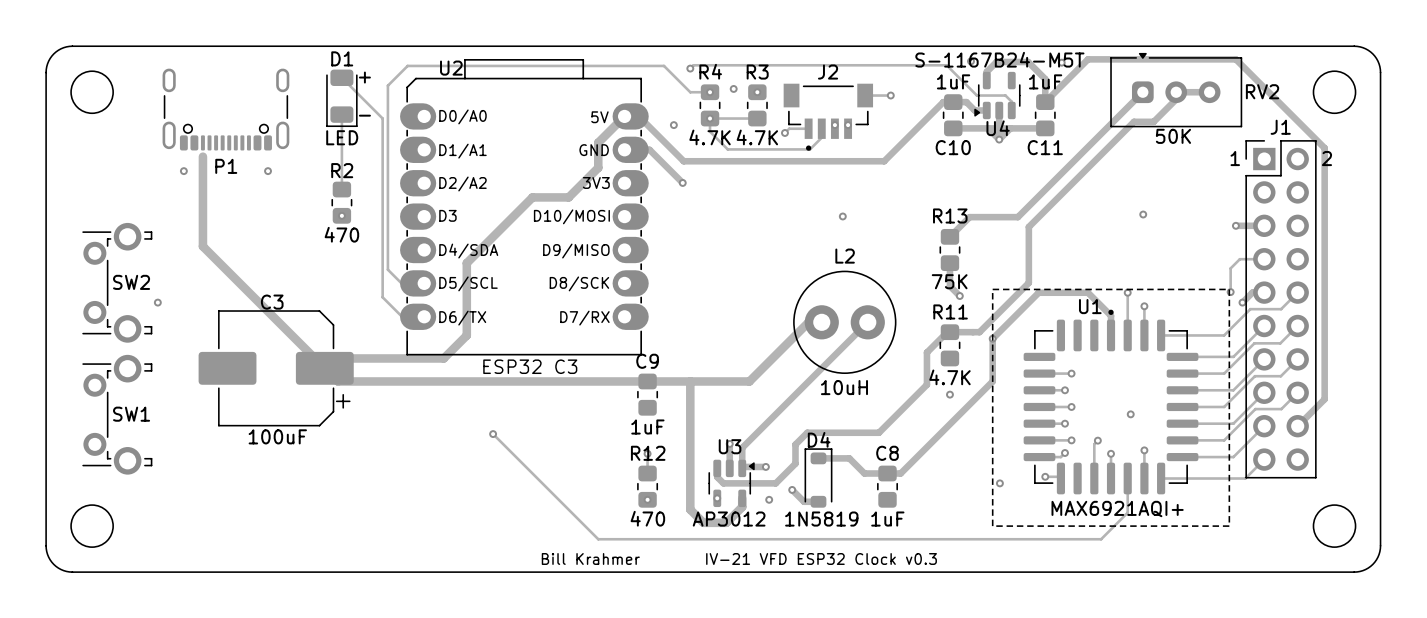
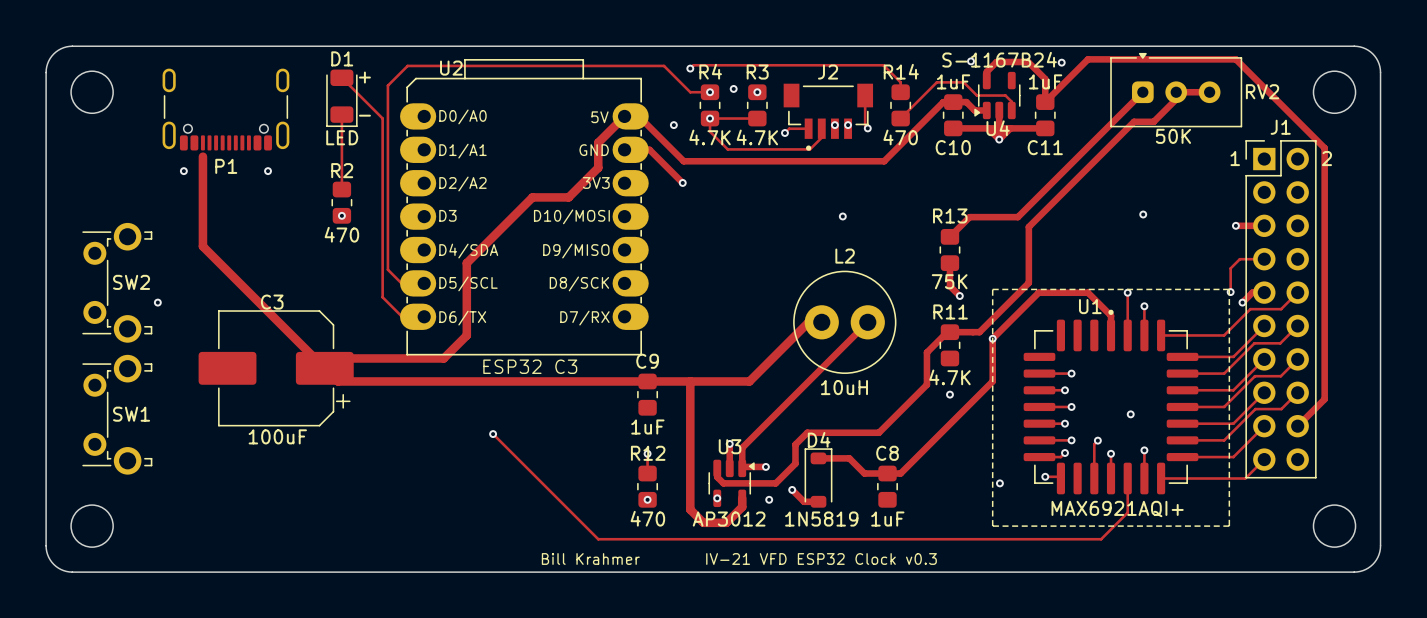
U4 value: S-1167B24-M5T (999, 59) -> S-1167B24 (999, 59)
track: (883, 65) (946, 65) (963, 82) -> (900, 118) (936, 82) (963, 82)
track: none -> (883, 65) (900, 82) (900, 92)
track: (865, 95) (890, 95) -> (865, 95) (865, 125) (867, 128)
via position: (890, 95) -> (867, 128)
R14: none -> 470 (900, 105)

